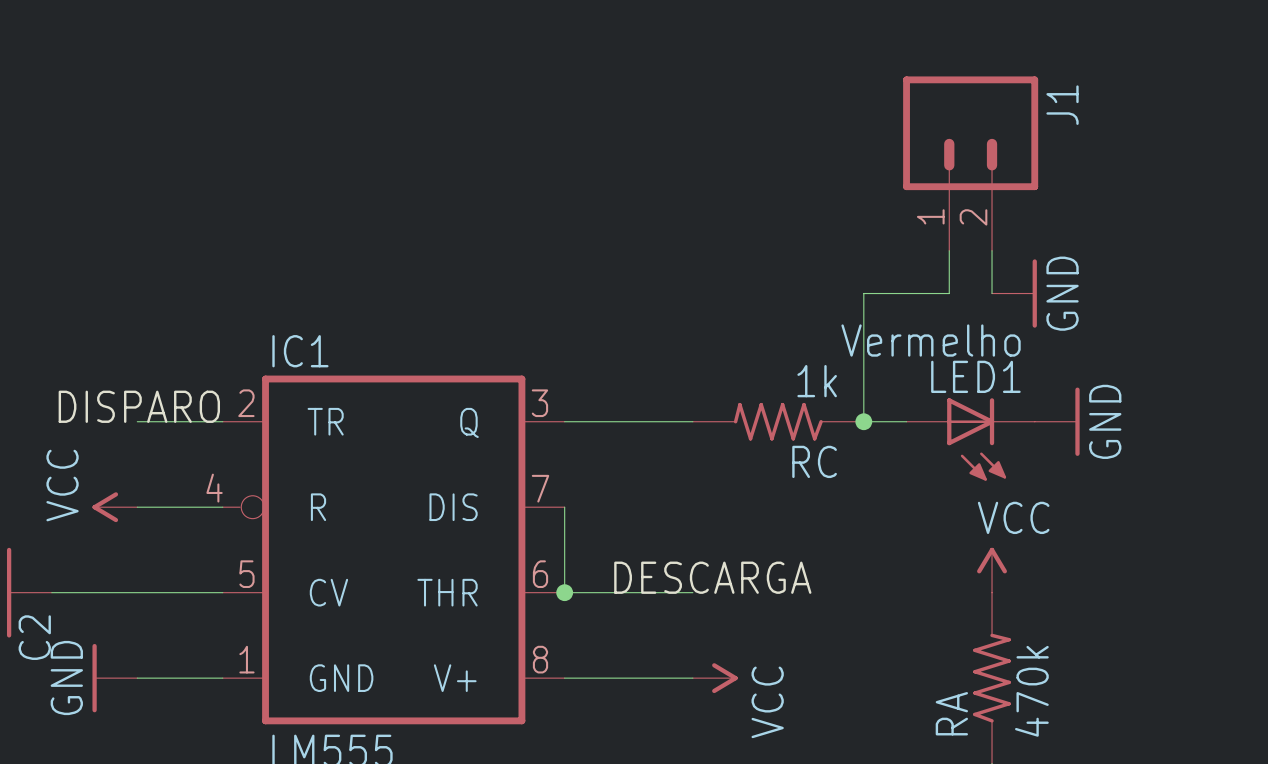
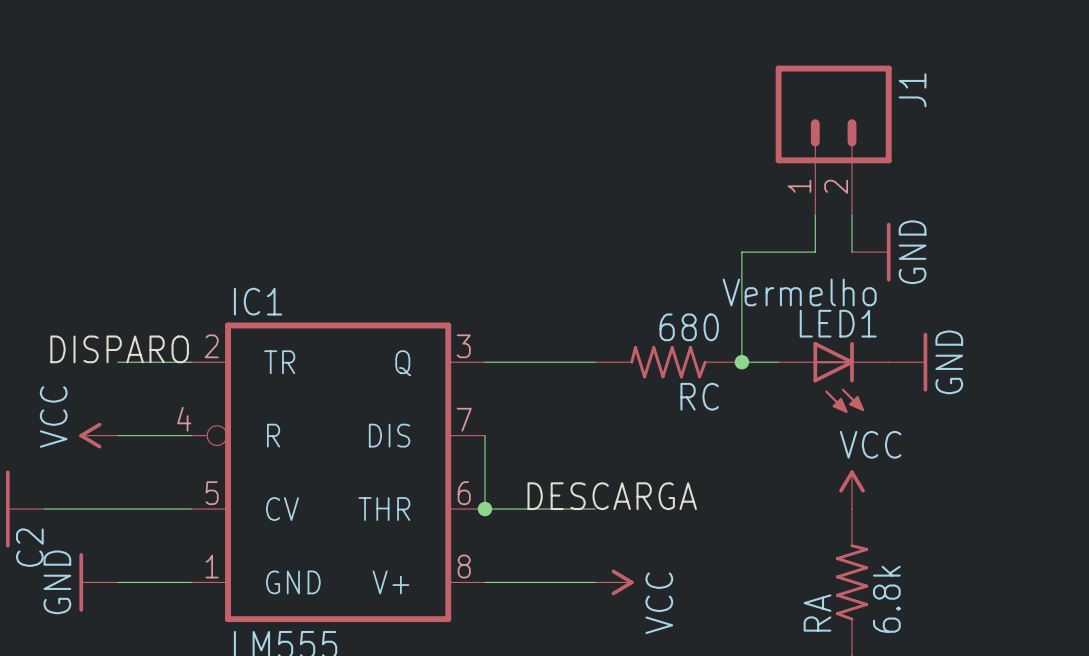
RC value: 1k (817, 381) -> 680 (689, 327)
RA value: 470k (1031, 691) -> 6.8k (886, 599)

